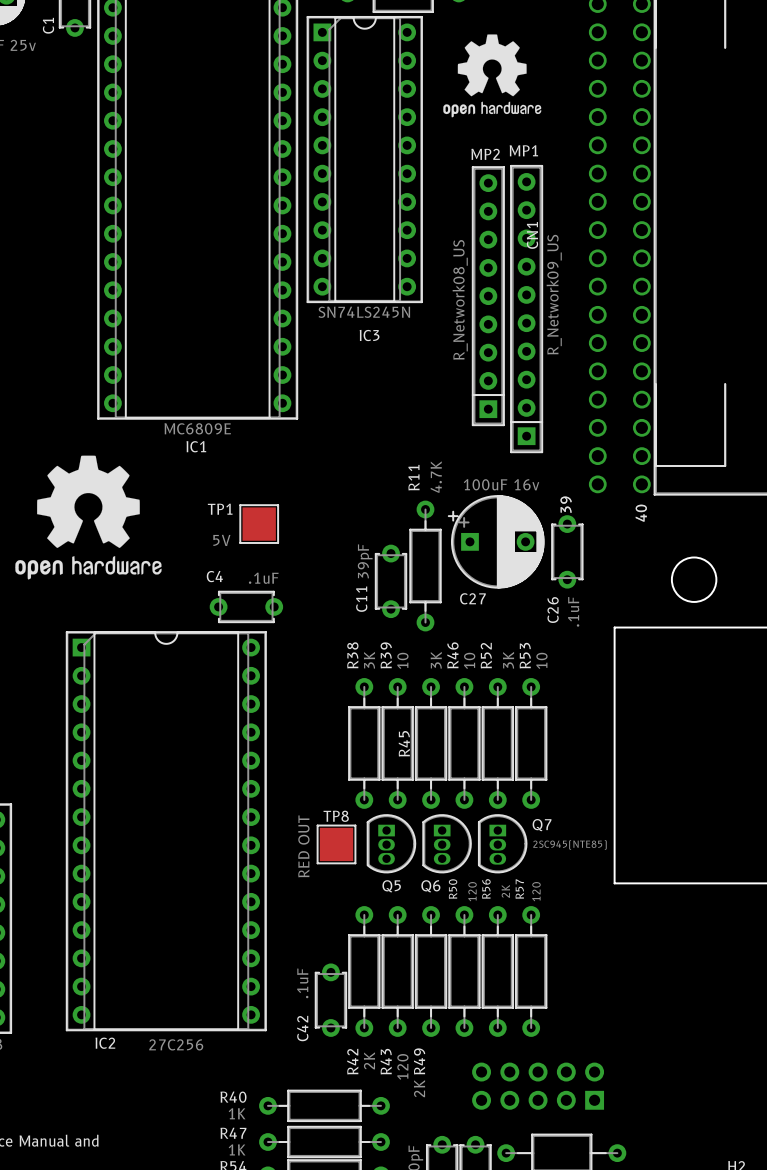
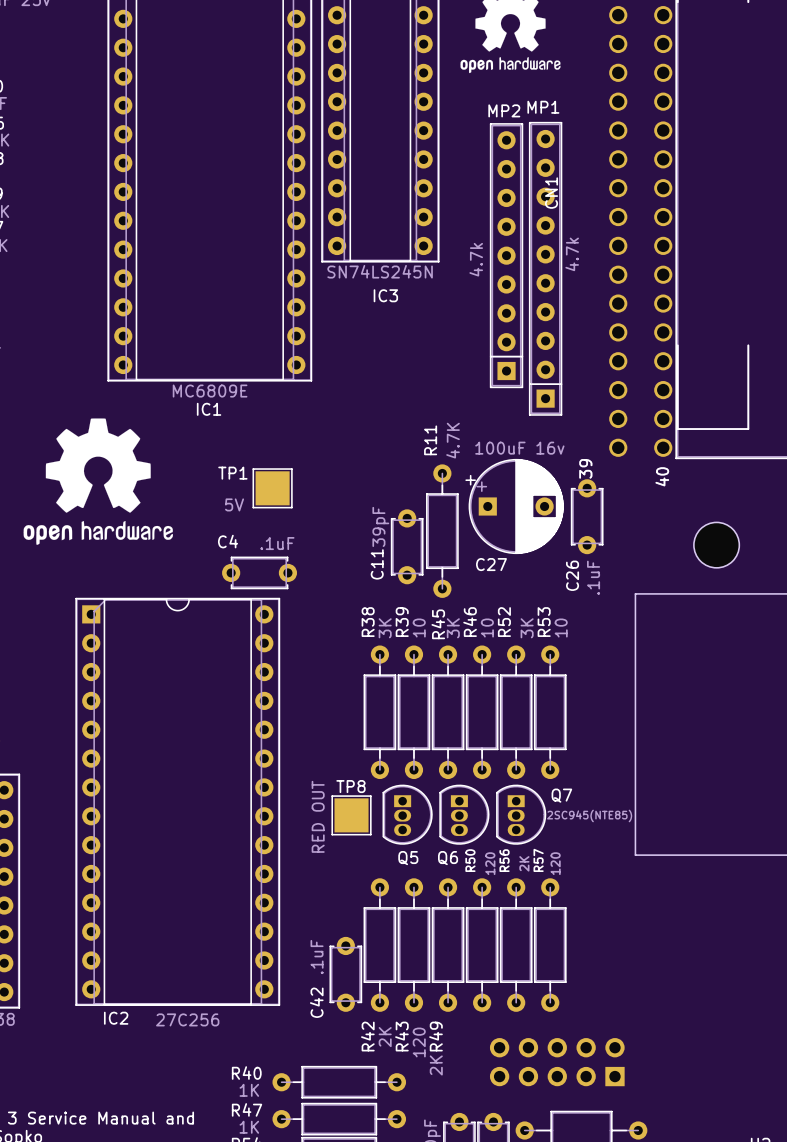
MP1 value: R_Network09_US (554, 294) -> 4.7k (572, 254)
MP2 value: R_Network08_US (460, 299) -> 4.7k (476, 259)
R45 name position: R45 (404, 743) -> R45 (438, 624)

